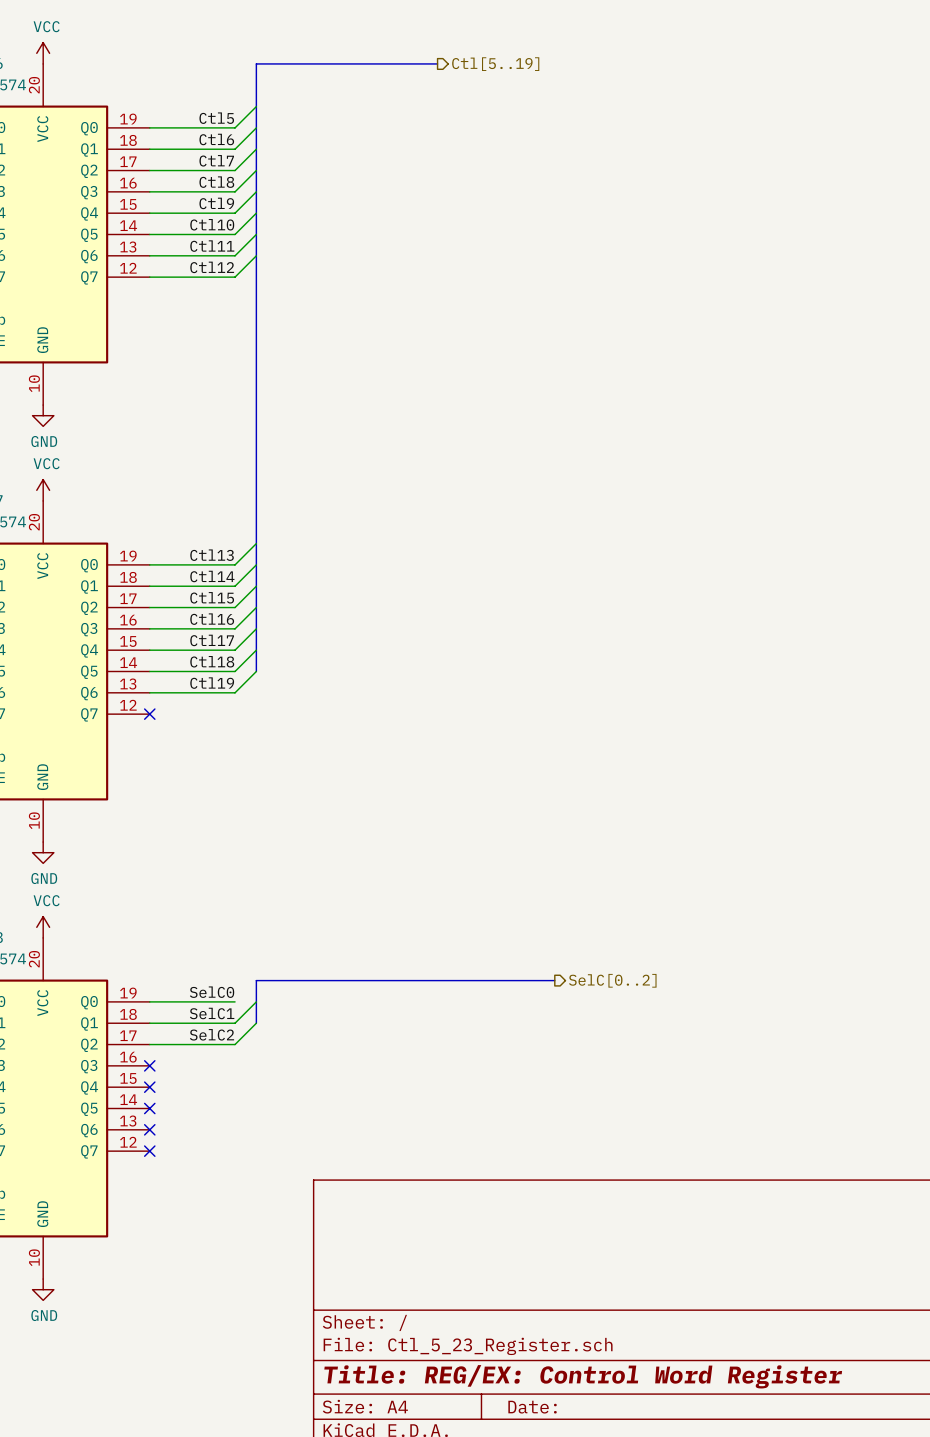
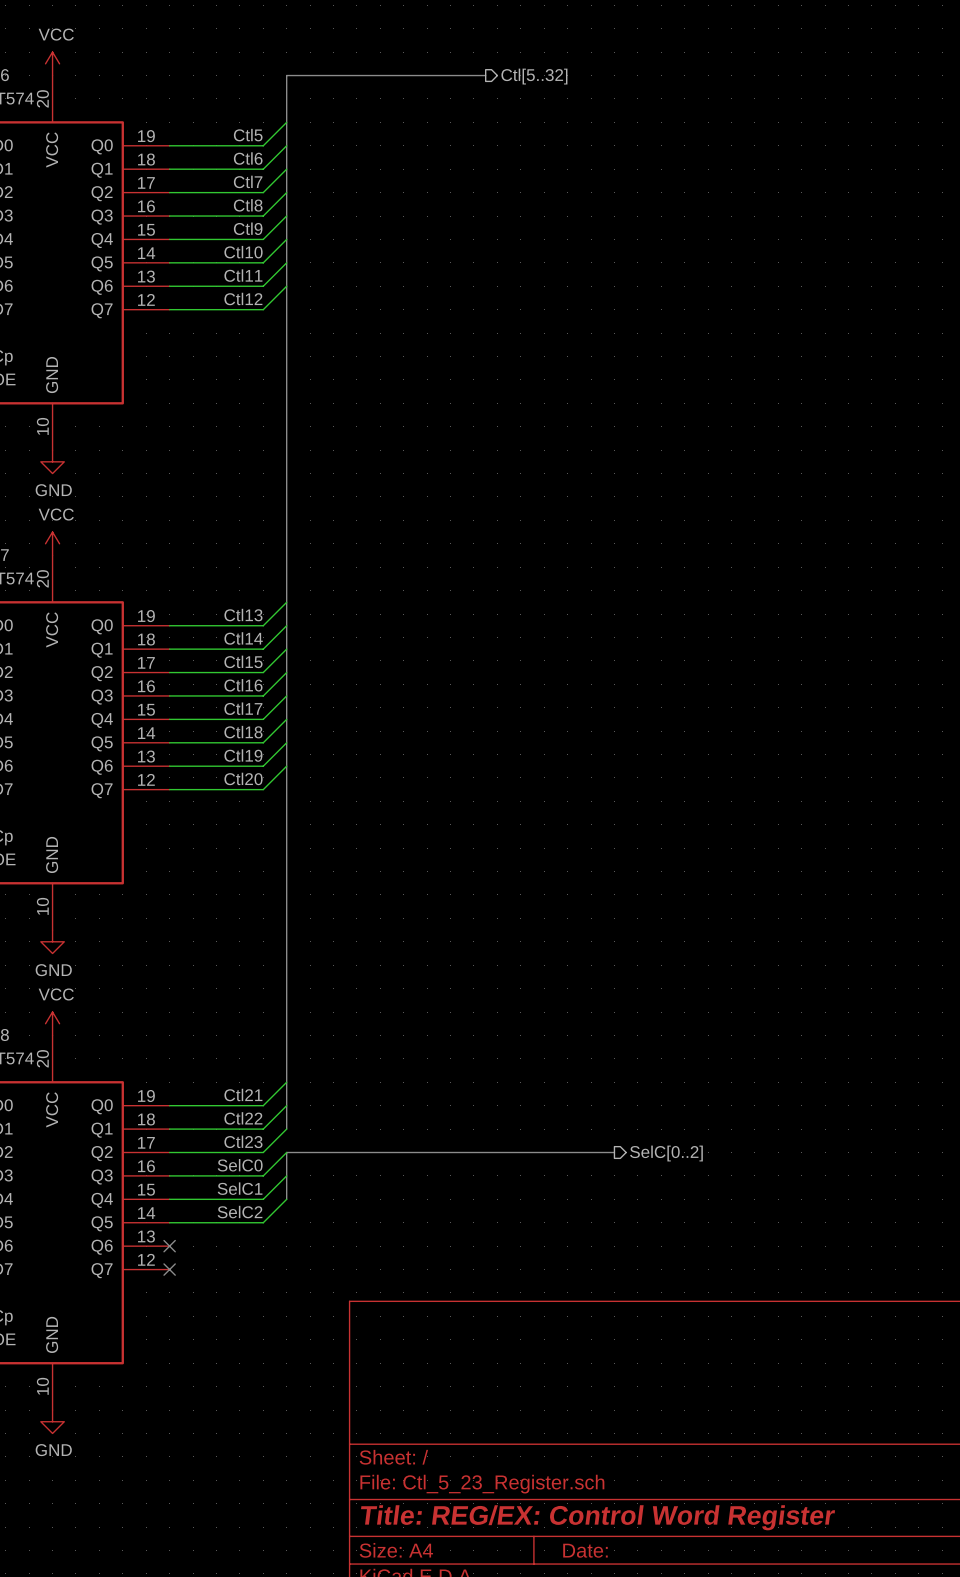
hierarchical label: Ctl[5..19] (495, 64) -> Ctl[5..32] (534, 76)
wire: none -> (286, 766) (263, 789) (169, 789)
label: none -> Ctl20 (243, 778)
no-connect mark: (149, 714) -> none
wire: none -> (286, 1082) (263, 1105)
bus: (256, 980) (554, 980) -> (286, 1082) (286, 742)
hierarchical label position: SelC[0..2] (612, 980) -> SelC[0..2] (666, 1153)
label: SelC0 (212, 992) -> Ctl21 (243, 1095)
label: SelC1 (212, 1013) -> Ctl22 (243, 1118)
label: SelC2 (212, 1034) -> Ctl23 (243, 1141)
wire: none -> (286, 1152) (263, 1175) (169, 1175)
bus: none -> (614, 1152) (286, 1152) (286, 1199)
label: none -> SelC0 (240, 1165)
no-connect mark: (149, 1065) -> none
wire: none -> (286, 1175) (263, 1199) (169, 1199)
label: none -> SelC1 (240, 1188)
no-connect mark: (149, 1087) -> none
wire: none -> (286, 1199) (263, 1222) (169, 1222)
label: none -> SelC2 (240, 1212)
no-connect mark: (149, 1108) -> none

